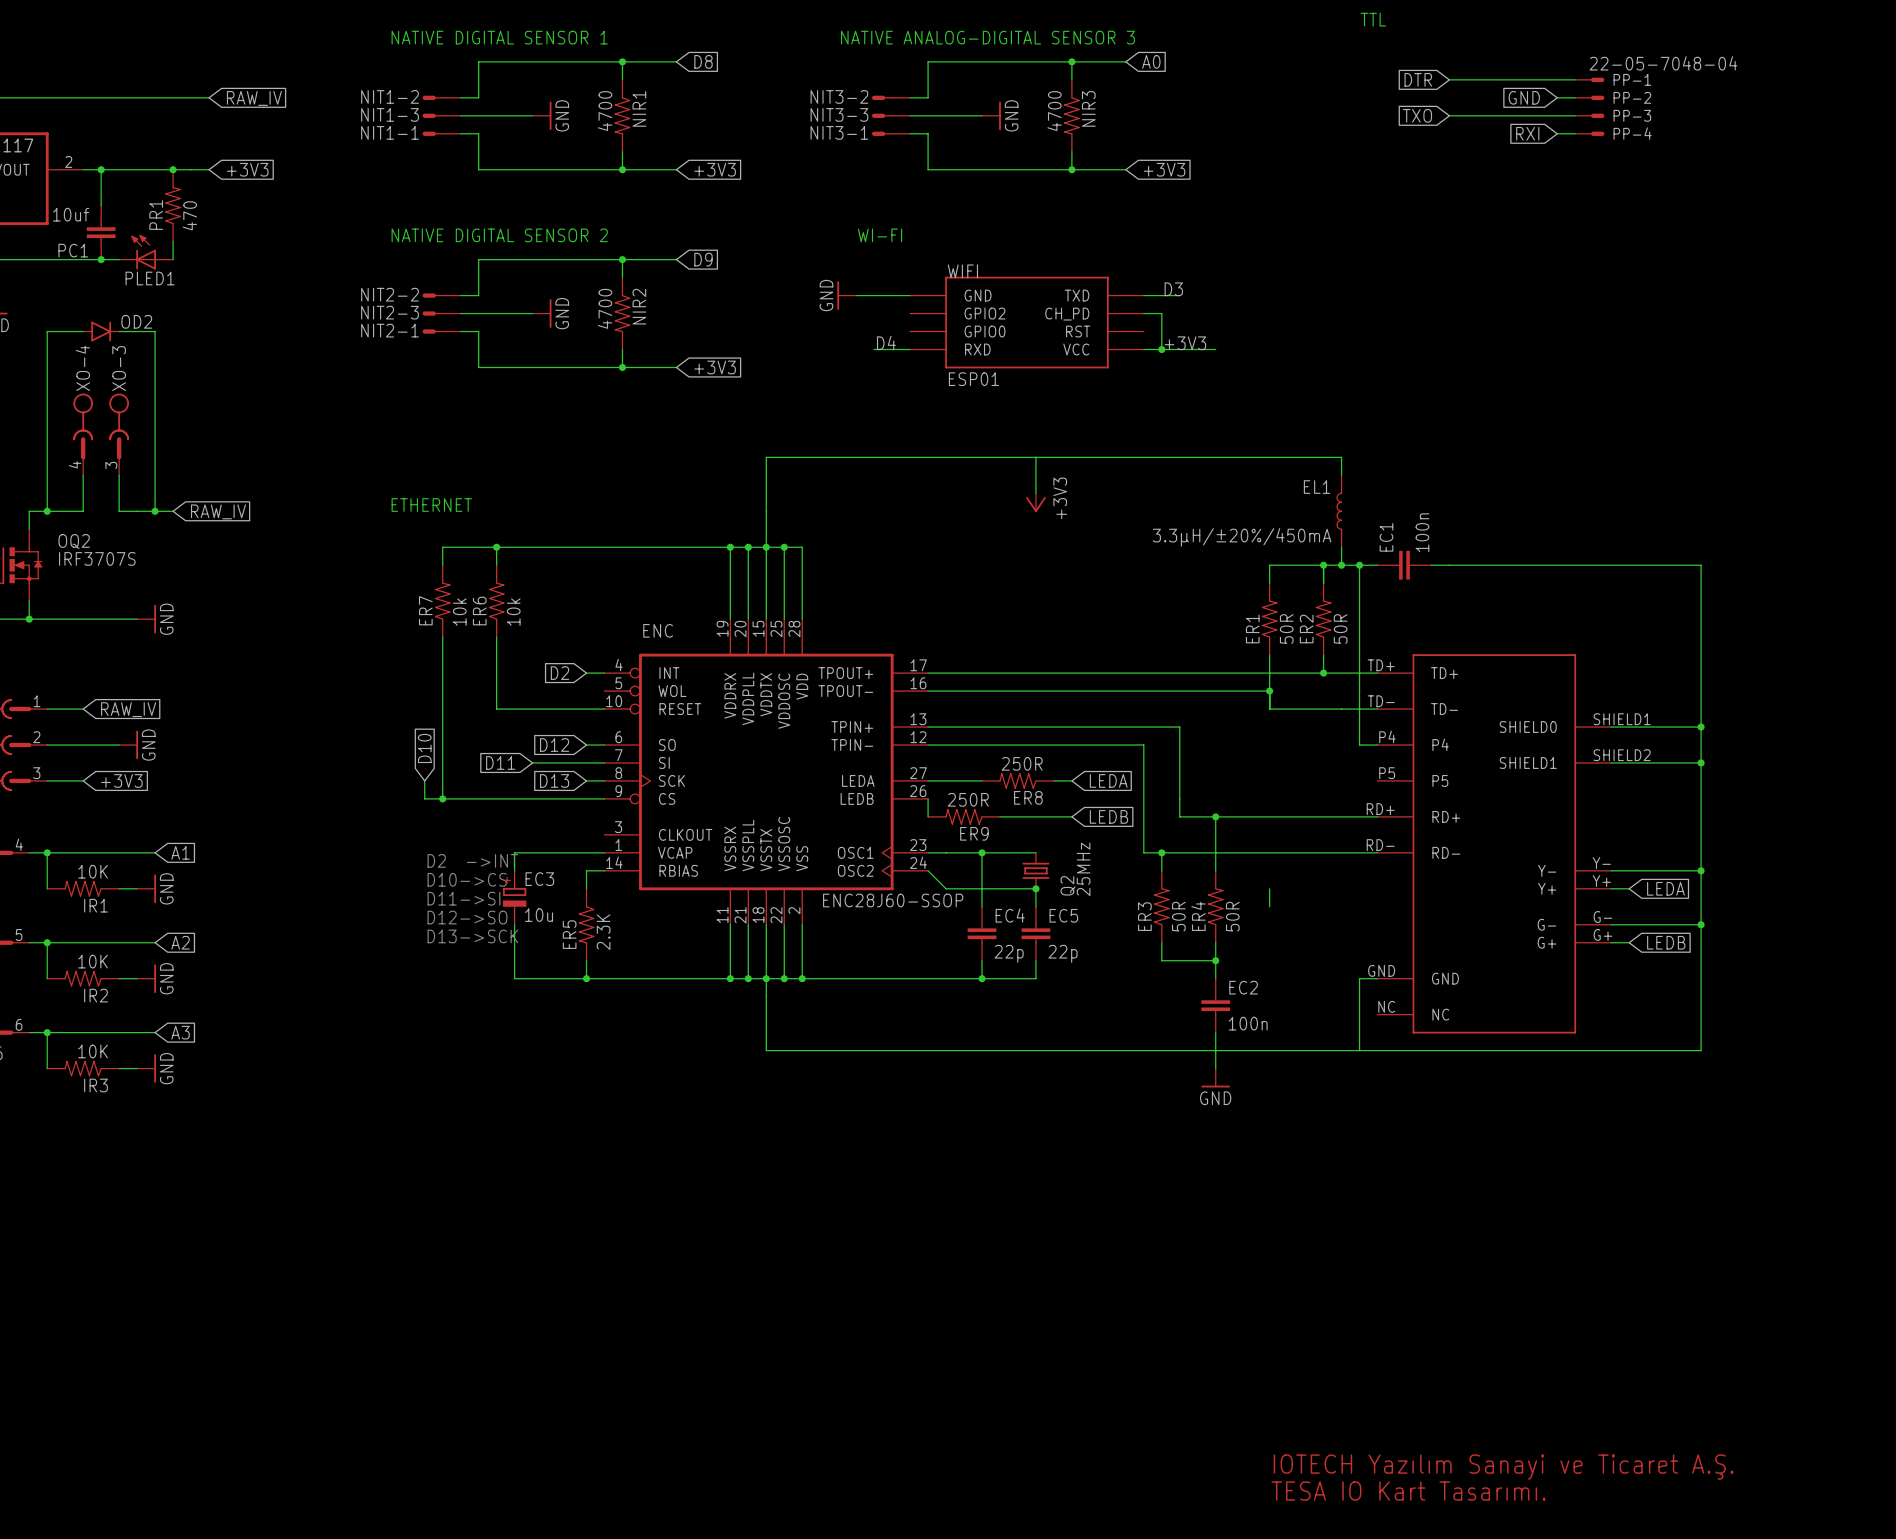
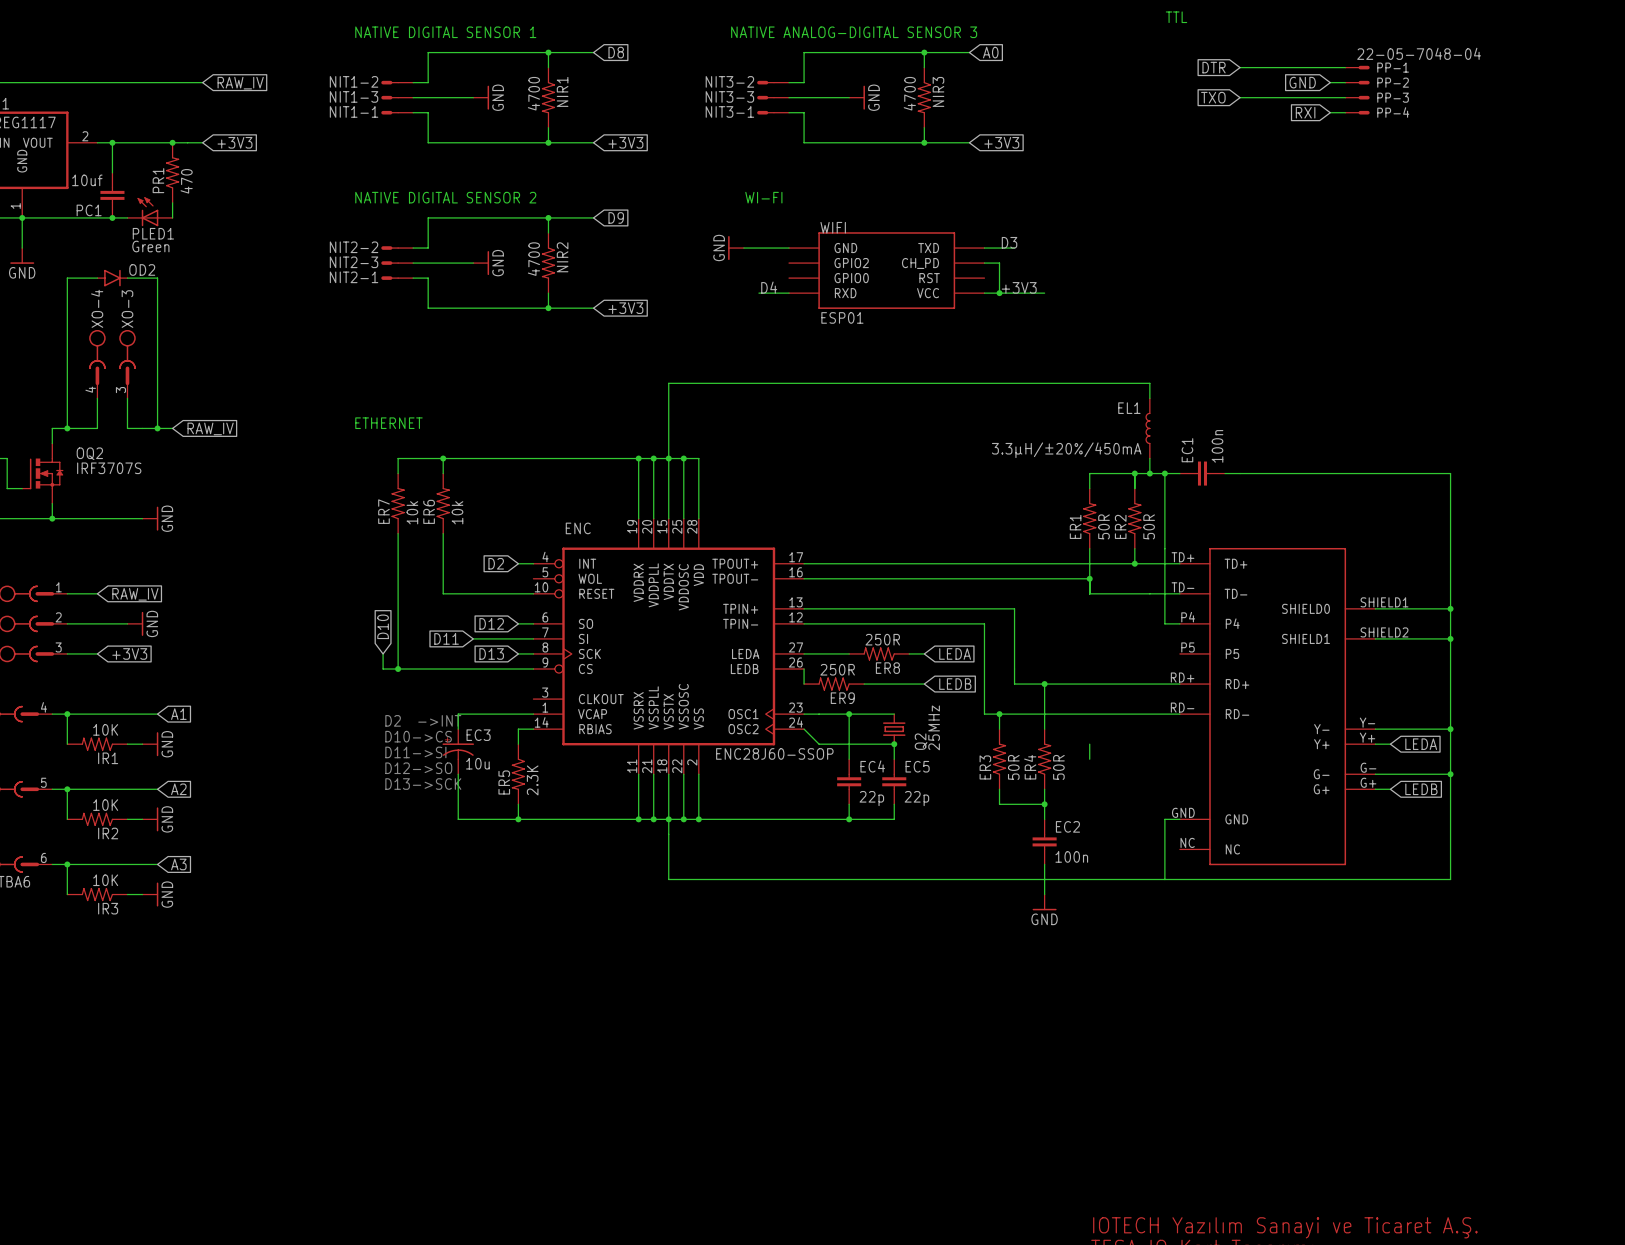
PLED1 value: none -> Green (150, 246)
wire: (1035, 457) (1035, 493) -> none
power symbol: +3V3 (1035, 502) -> none
EC3 symbol: [502, 870, 527, 925] -> [442, 729, 475, 775]

